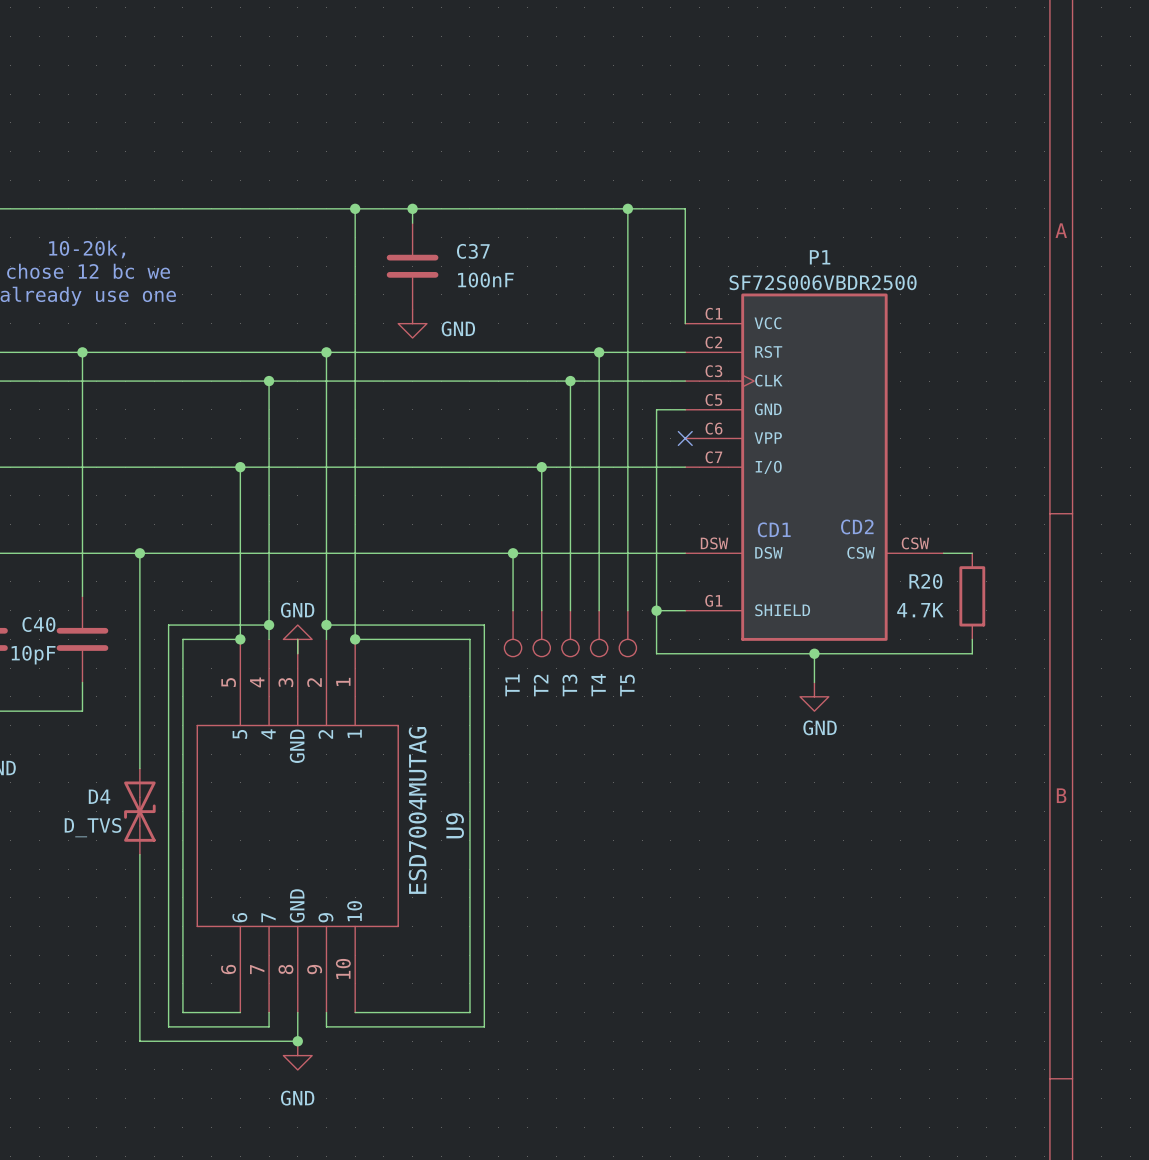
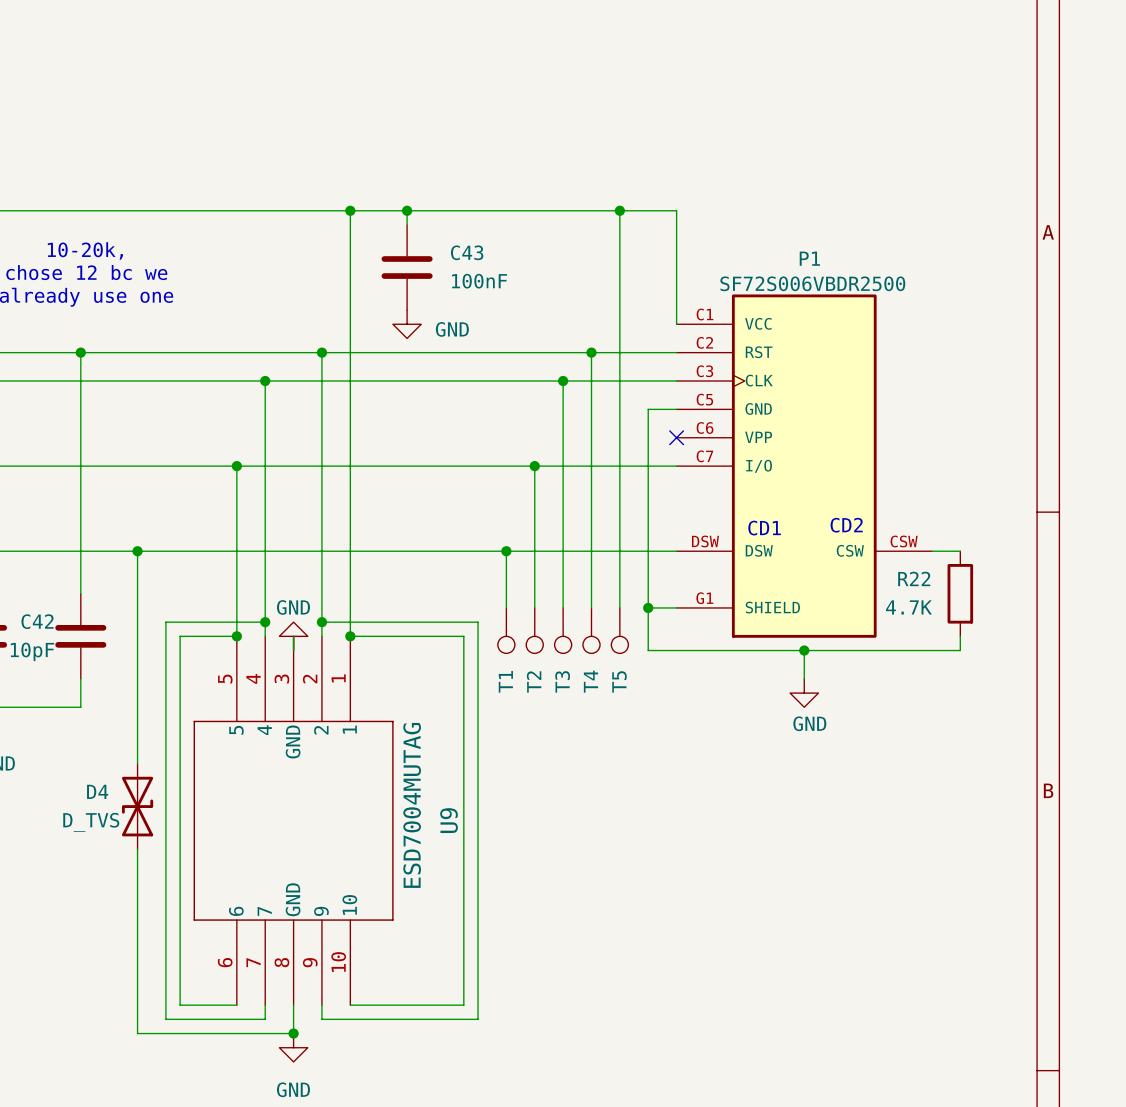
C37 name: C37 (473, 251) -> C43 (467, 252)
R20 name: R20 (925, 581) -> R22 (914, 578)
C40 name: C40 (38, 624) -> C42 (37, 621)

